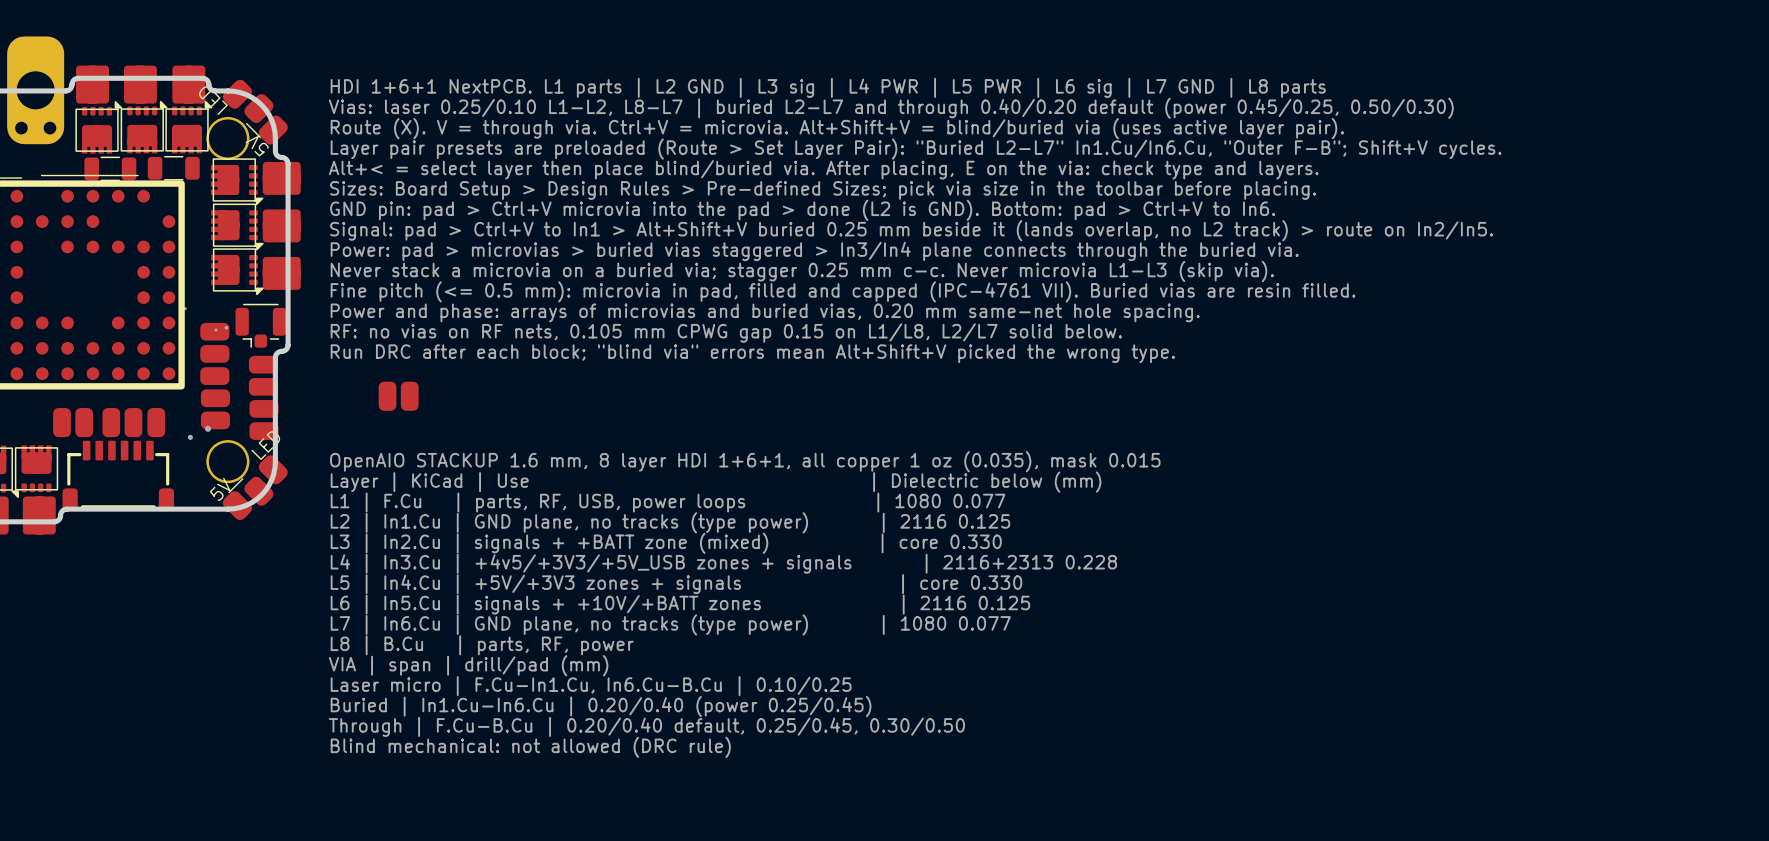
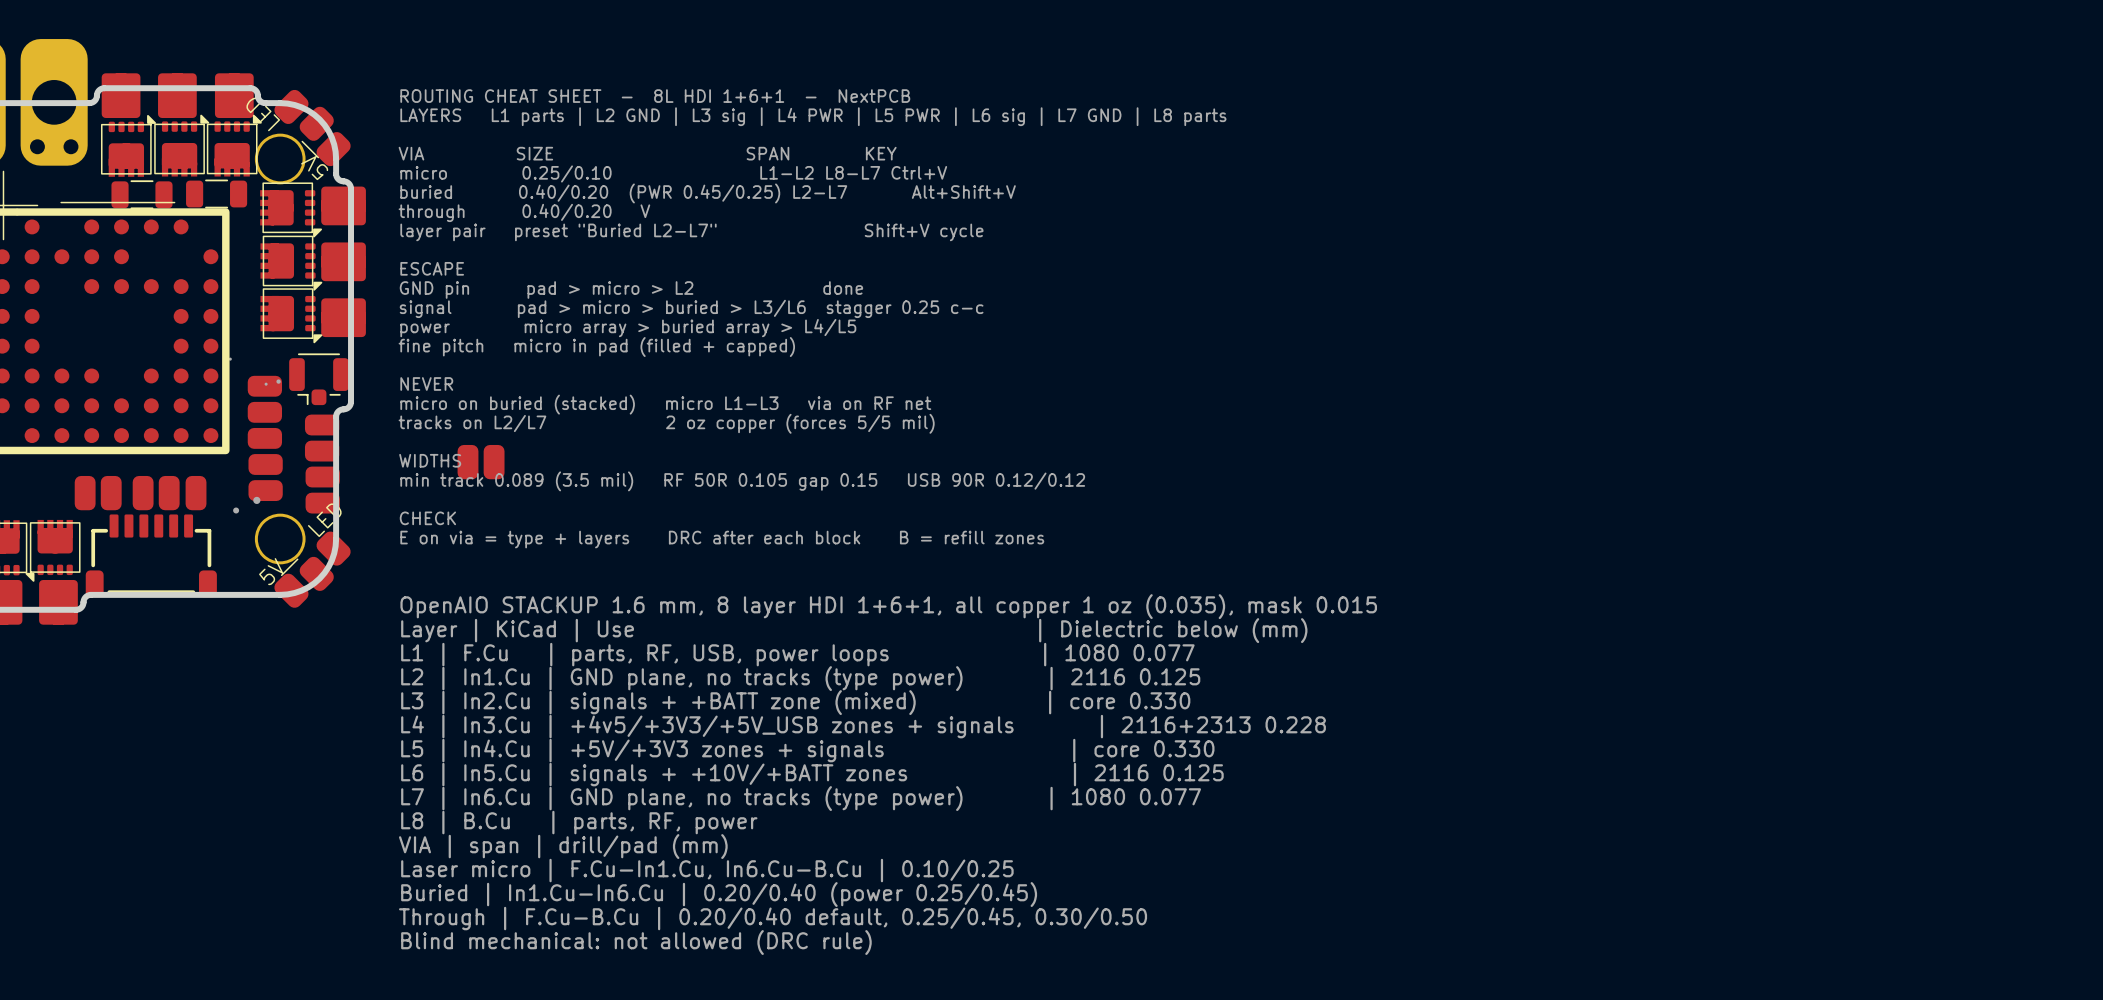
text: HDI 1+6+1 NextPCB. L1 parts | L2 GND | L3 sig | L4 PWR | L5 PWR | L6 sig | L7 GND | L8 parts (828, 87) -> ROUTING CHEAT SHEET - 8L HDI 1+6+1 - NextPCB (655, 96)
text: Vias: laser 0.25/0.10 L1-L2, L8-L7 | buried L2-L7 and through 0.40/0.20 default (power 0.45/0.25, 0.50/0.30) (891, 108) -> LAYERS L1 parts | L2 GND | L3 sig | L4 PWR | L5 PWR | L6 sig | L7 GND | L8 parts (813, 116)
text: Route (X). V = through via. Ctrl+V = microvia. Alt+Shift+V = blind/buried via (uses active layer pair). (837, 128) -> none
text: none -> VIA SIZE SPAN KEY (647, 153)
text: Layer pair presets are preloaded (Route > Set Layer Pair): "Buried L2-L7" In1.Cu/In6.Cu, "Outer F-B"; Shift+V cycles. (916, 149) -> micro 0.25/0.10 L1-L2 L8-L7 Ctrl+V (673, 173)
text: Alt+< = select layer then place blind/buried via. After placing, E on the via: check type and layers. (823, 169) -> buried 0.40/0.20 (PWR 0.45/0.25) L2-L7 Alt+Shift+V (708, 193)
text: Sizes: Board Setup > Design Rules > Pre-defined Sizes; pick via size in the toolbar before placing. (823, 190) -> through 0.40/0.20 V (524, 212)
text: none -> layer pair preset "Buried L2-L7" Shift+V cycle (691, 232)
text: GND pin: pad > Ctrl+V microvia into the pad > done (L2 is GND). Bottom: pad > Ctrl+V to In6. (802, 210) -> none
text: Signal: pad > Ctrl+V to In1 > Alt+Shift+V buried 0.25 mm beside it (lands overlap, no L2 track) > route on In2/In5. (911, 230) -> ESCAPE (432, 268)
text: Power: pad > microvias > buried vias staggered > In3/In4 plane connects through the buried via. (814, 251) -> GND pin pad > micro > L2 done (631, 290)
text: Never stack a microvia on a buried via; stagger 0.25 mm c-c. Never microvia L1-L3 (skip via). (802, 271) -> signal pad > micro > buried > L3/L6 stagger 0.25 c-c (691, 308)
text: none -> power micro array > buried array > L4/L5 (628, 328)
text: Fine pitch (<= 0.5 mm): microvia in pad, filled and capped (IPC-4761 VII). Buried vias are resin filled. (843, 291) -> none
text: none -> fine pitch micro in pad (filled + capped) (596, 347)
text: Power and phase: arrays of microvias and buried vias, 0.20 mm same-net hole spacing. (765, 312) -> none
text: RF: no vias on RF nets, 0.105 mm CPWG gap 0.15 on L1/L8, L2/L7 solid below. (726, 333) -> NEVER (426, 383)
text: Run DRC after each block; "blind via" errors mean Alt+Shift+V picked the wrong type. (752, 353) -> micro on buried (stacked) micro L1-L3 via on RF net (665, 404)
text: none -> tracks on L2/L7 2 oz copper (forces 5/5 mil) (666, 423)
text: none -> WIDTHS (430, 460)
text: none -> min track 0.089 (3.5 mil) RF 50R 0.105 gap 0.15 USB 90R 0.12/0.12 (742, 481)
text: none -> CHECK (427, 518)
text position: OpenAIO STACKUP 1.6 mm, 8 layer HDI 1+6+1, all copper 1 oz (0.035), mask 0.015 (745, 461) -> OpenAIO STACKUP 1.6 mm, 8 layer HDI 1+6+1, all copper 1 oz (0.035), mask 0.015 (888, 606)
text: none -> E on via = type + layers DRC after each block B = refill zones (722, 539)
text position: Layer | KiCad | Use | Dielectric below (mm) (716, 482) -> Layer | KiCad | Use | Dielectric below (mm) (854, 630)
text position: L1 | F.Cu | parts, RF, USB, power loops | 1080 0.077 (668, 502) -> L1 | F.Cu | parts, RF, USB, power loops | 1080 0.077 (797, 654)
text position: L2 | In1.Cu | GND plane, no tracks (type power) | 2116 0.125 (670, 522) -> L2 | In1.Cu | GND plane, no tracks (type power) | 2116 0.125 (800, 678)
text position: L3 | In2.Cu | signals + +BATT zone (mixed) | core 0.330 (666, 543) -> L3 | In2.Cu | signals + +BATT zone (mixed) | core 0.330 (795, 702)
text position: L4 | In3.Cu | +4v5/+3V3/+5V_USB zones + signals | 2116+2313 0.228 (723, 563) -> L4 | In3.Cu | +4v5/+3V3/+5V_USB zones + signals | 2116+2313 0.228 (863, 726)
text position: L5 | In4.Cu | +5V/+3V3 zones + signals | core 0.330 (676, 584) -> L5 | In4.Cu | +5V/+3V3 zones + signals | core 0.330 (807, 750)
text position: L6 | In5.Cu | signals + +10V/+BATT zones | 2116 0.125 (680, 604) -> L6 | In5.Cu | signals + +10V/+BATT zones | 2116 0.125 (812, 774)
text position: L7 | In6.Cu | GND plane, no tracks (type power) | 1080 0.077 (670, 624) -> L7 | In6.Cu | GND plane, no tracks (type power) | 1080 0.077 (801, 798)
text position: L8 | B.Cu | parts, RF, power (482, 645) -> L8 | B.Cu | parts, RF, power (579, 822)
text position: VIA | span | drill/pad (mm) (468, 665) -> VIA | span | drill/pad (mm) (563, 846)
text position: Laser micro | F.Cu-In1.Cu, In6.Cu-B.Cu | 0.10/0.25 (591, 686) -> Laser micro | F.Cu-In1.Cu, In6.Cu-B.Cu | 0.10/0.25 (707, 870)
text position: Buried | In1.Cu-In6.Cu | 0.20/0.40 (power 0.25/0.45) (601, 706) -> Buried | In1.Cu-In6.Cu | 0.20/0.40 (power 0.25/0.45) (719, 894)
text position: Through | F.Cu-B.Cu | 0.20/0.40 default, 0.25/0.45, 0.30/0.50 (646, 726) -> Through | F.Cu-B.Cu | 0.20/0.40 default, 0.25/0.45, 0.30/0.50 (773, 918)
text position: Blind mechanical: not allowed (DRC rule) (530, 747) -> Blind mechanical: not allowed (DRC rule) (636, 942)

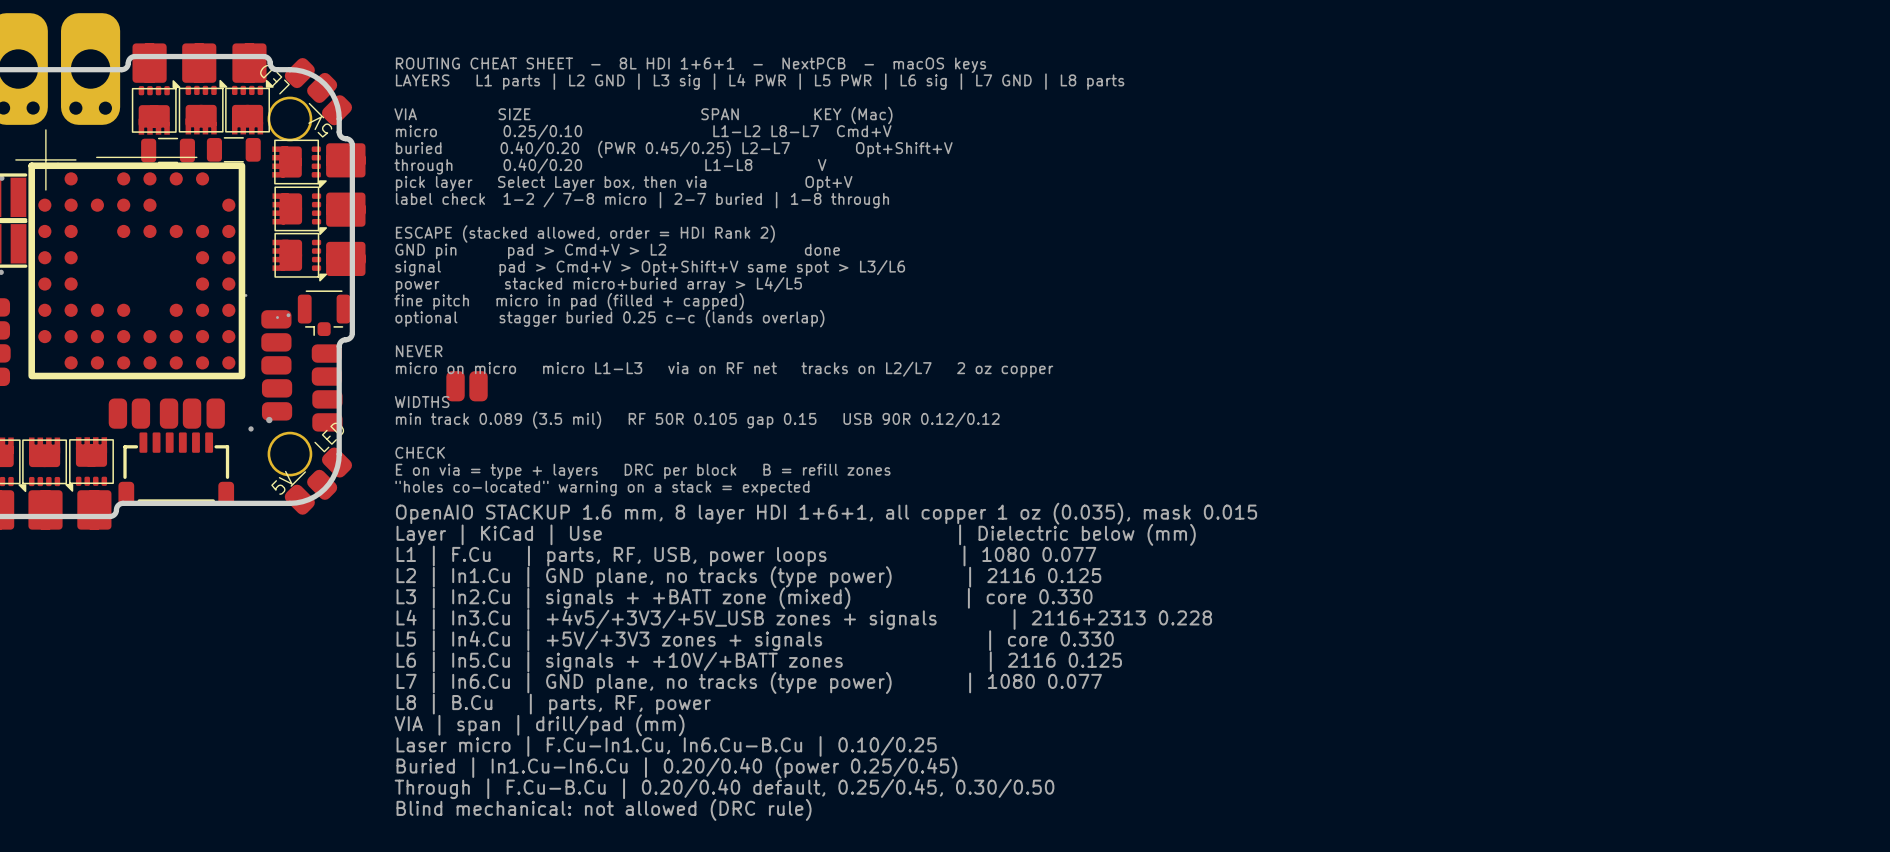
text: ROUTING CHEAT SHEET - 8L HDI 1+6+1 - NextPCB (655, 96) -> ROUTING CHEAT SHEET - 8L HDI 1+6+1 - NextPCB - macOS keys (691, 65)
text: VIA SIZE SPAN KEY (647, 153) -> VIA SIZE SPAN KEY (Mac) (643, 115)
text: micro 0.25/0.10 L1-L2 L8-L7 Ctrl+V (673, 173) -> micro 0.25/0.10 L1-L2 L8-L7 Cmd+V (643, 132)
text: buried 0.40/0.20 (PWR 0.45/0.25) L2-L7 Alt+Shift+V (708, 193) -> buried 0.40/0.20 (PWR 0.45/0.25) L2-L7 Opt+Shift+V (674, 149)
text: through 0.40/0.20 V (524, 212) -> through 0.40/0.20 L1-L8 V (610, 166)
text: layer pair preset "Buried L2-L7" Shift+V cycle (691, 232) -> pick layer Select Layer box, then via Opt+V (624, 183)
text: none -> label check 1-2 / 7-8 micro | 2-7 buried | 1-8 through (642, 200)
text: ESCAPE (432, 268) -> none
text: GND pin pad > micro > L2 done (631, 290) -> ESCAPE (stacked allowed, order = HDI Rank 2) (585, 233)
text: signal pad > micro > buried > L3/L6 stagger 0.25 c-c (691, 308) -> GND pin pad > Cmd+V > L2 done (617, 251)
text: power micro array > buried array > L4/L5 (628, 328) -> signal pad > Cmd+V > Opt+Shift+V same spot > L3/L6 (650, 268)
text: fine pitch micro in pad (filled + capped) (596, 347) -> power stacked micro+buried array > L4/L5 (598, 285)
text: none -> fine pitch micro in pad (filled + capped) (569, 301)
text: NEVER (426, 383) -> optional stagger buried 0.25 c-c (lands overlap) (609, 318)
text: micro on buried (stacked) micro L1-L3 via on RF net (665, 404) -> none
text: tracks on L2/L7 2 oz copper (forces 5/5 mil) (666, 423) -> NEVER (419, 351)
text: none -> micro on micro micro L1-L3 via on RF net tracks on L2/L7 2 oz copper (724, 369)
text: WIDTHS (430, 460) -> none
text: min track 0.089 (3.5 mil) RF 50R 0.105 gap 0.15 USB 90R 0.12/0.12 (742, 481) -> WIDTHS (422, 402)
text: none -> min track 0.089 (3.5 mil) RF 50R 0.105 gap 0.15 USB 90R 0.12/0.12 (697, 420)
text: CHECK (427, 518) -> none
text: E on via = type + layers DRC after each block B = refill zones (722, 539) -> CHECK (420, 452)
text: none -> E on via = type + layers DRC per block B = refill zones (643, 471)
text: none -> "holes co-located" warning on a stack = expected (602, 488)

